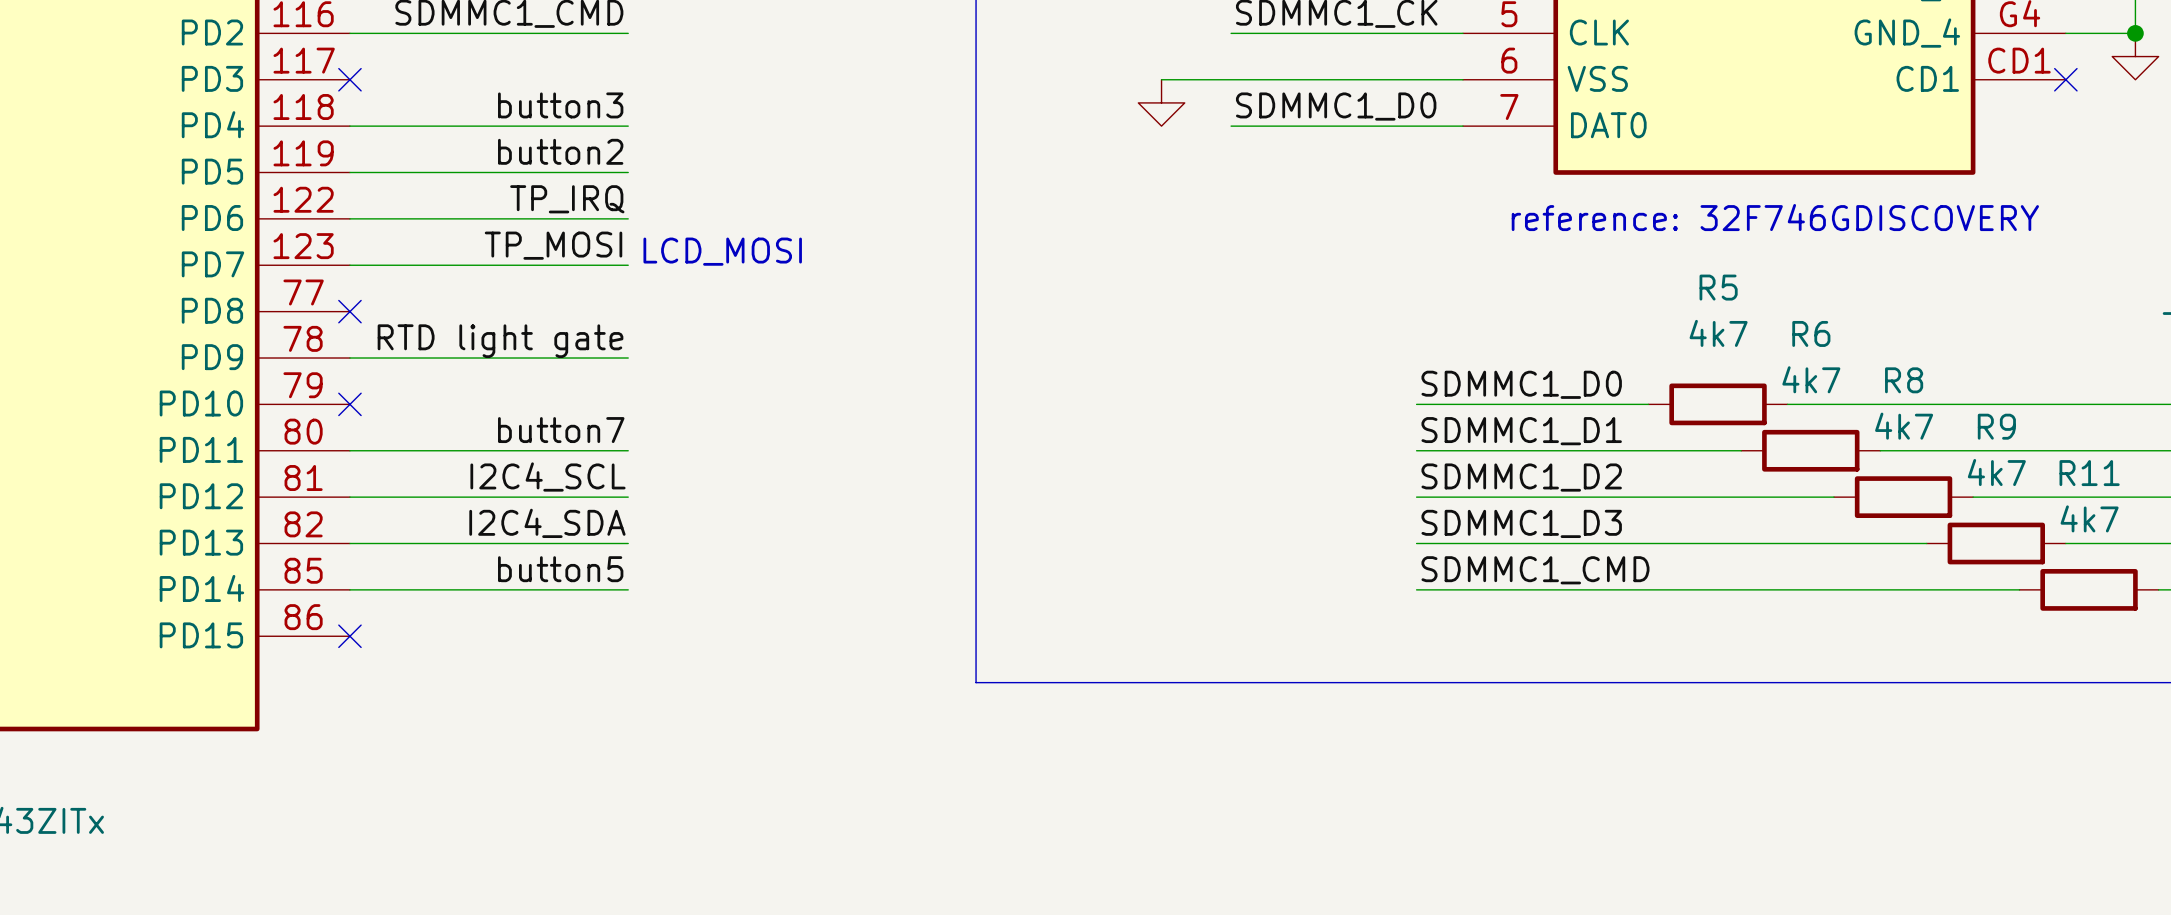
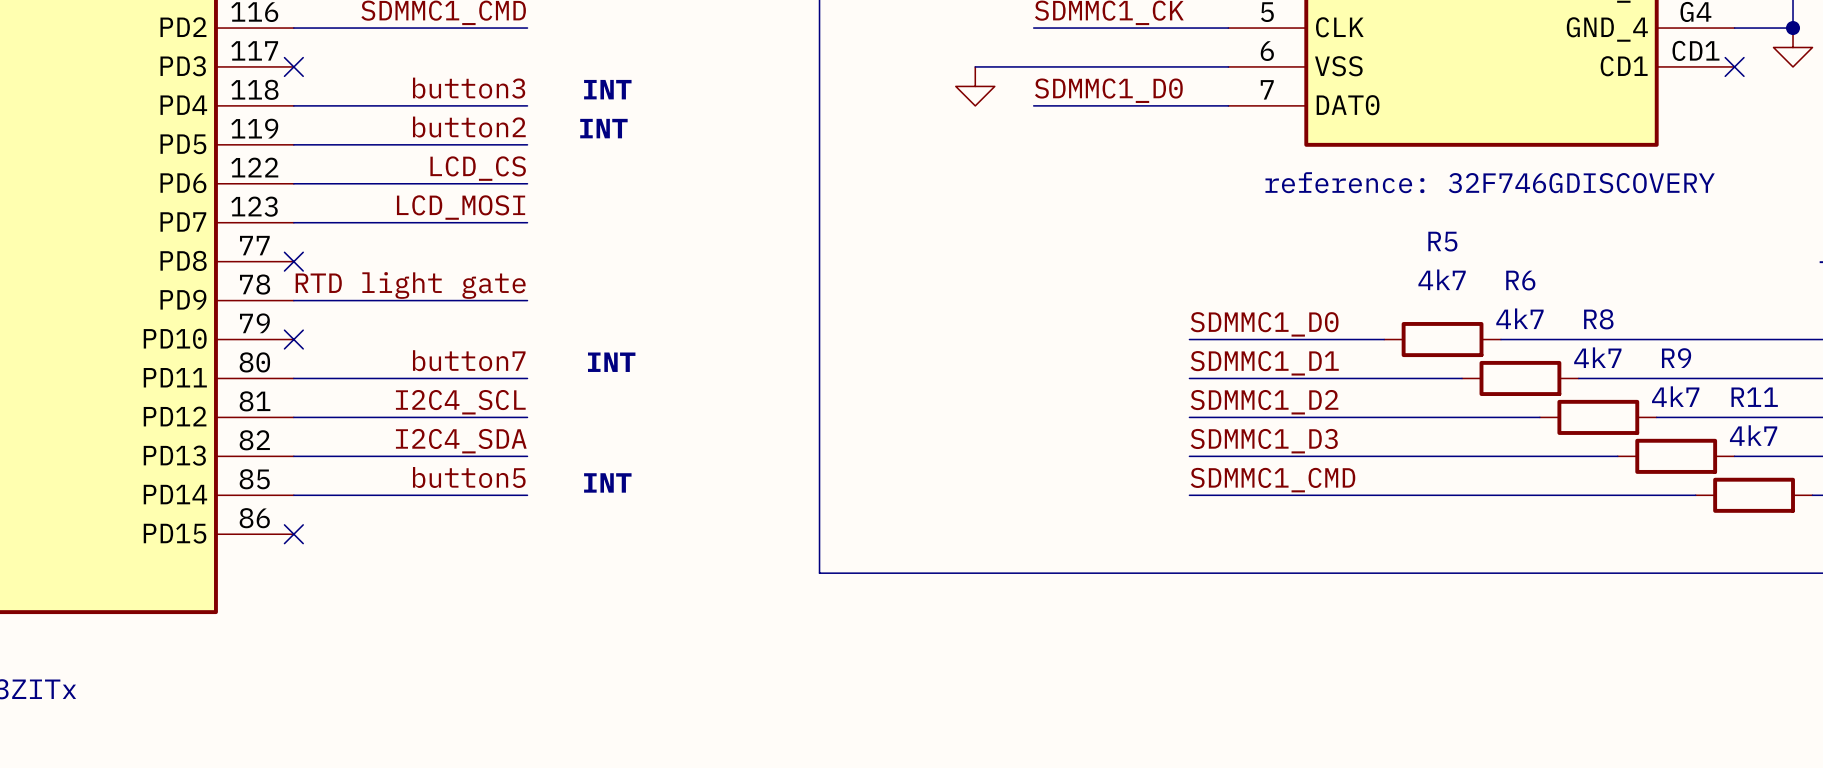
text: none -> INT (607, 89)
text: none -> INT (603, 128)
label: TP_IRQ (567, 199) -> LCD_CS (478, 168)
label: TP_MOSI (553, 245) -> LCD_MOSI (461, 207)
text: LCD_MOSI (722, 251) -> none
text: none -> INT (611, 362)
text: none -> INT (607, 482)

